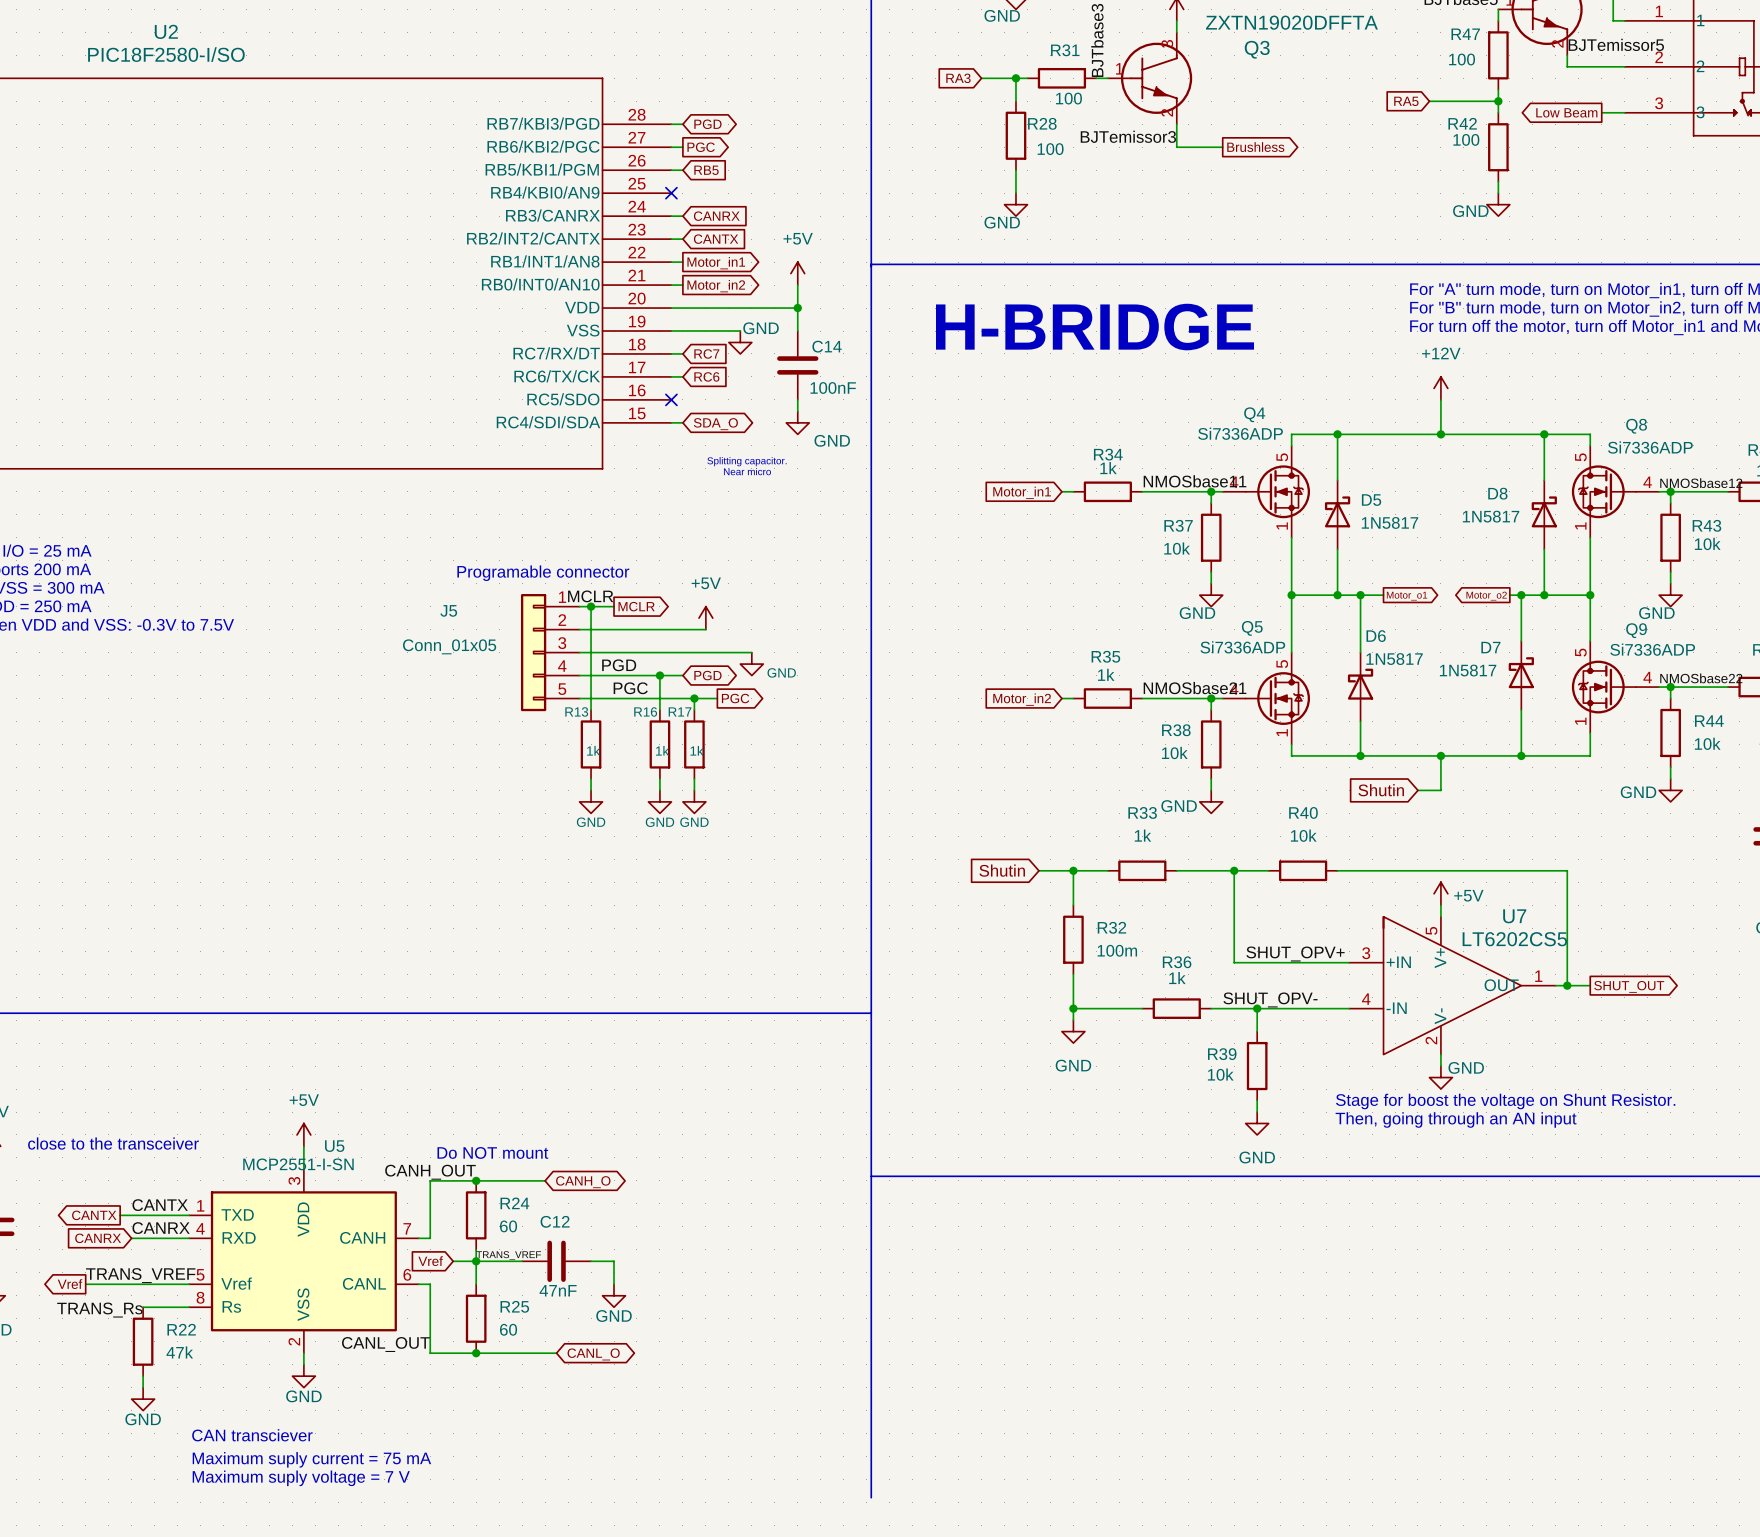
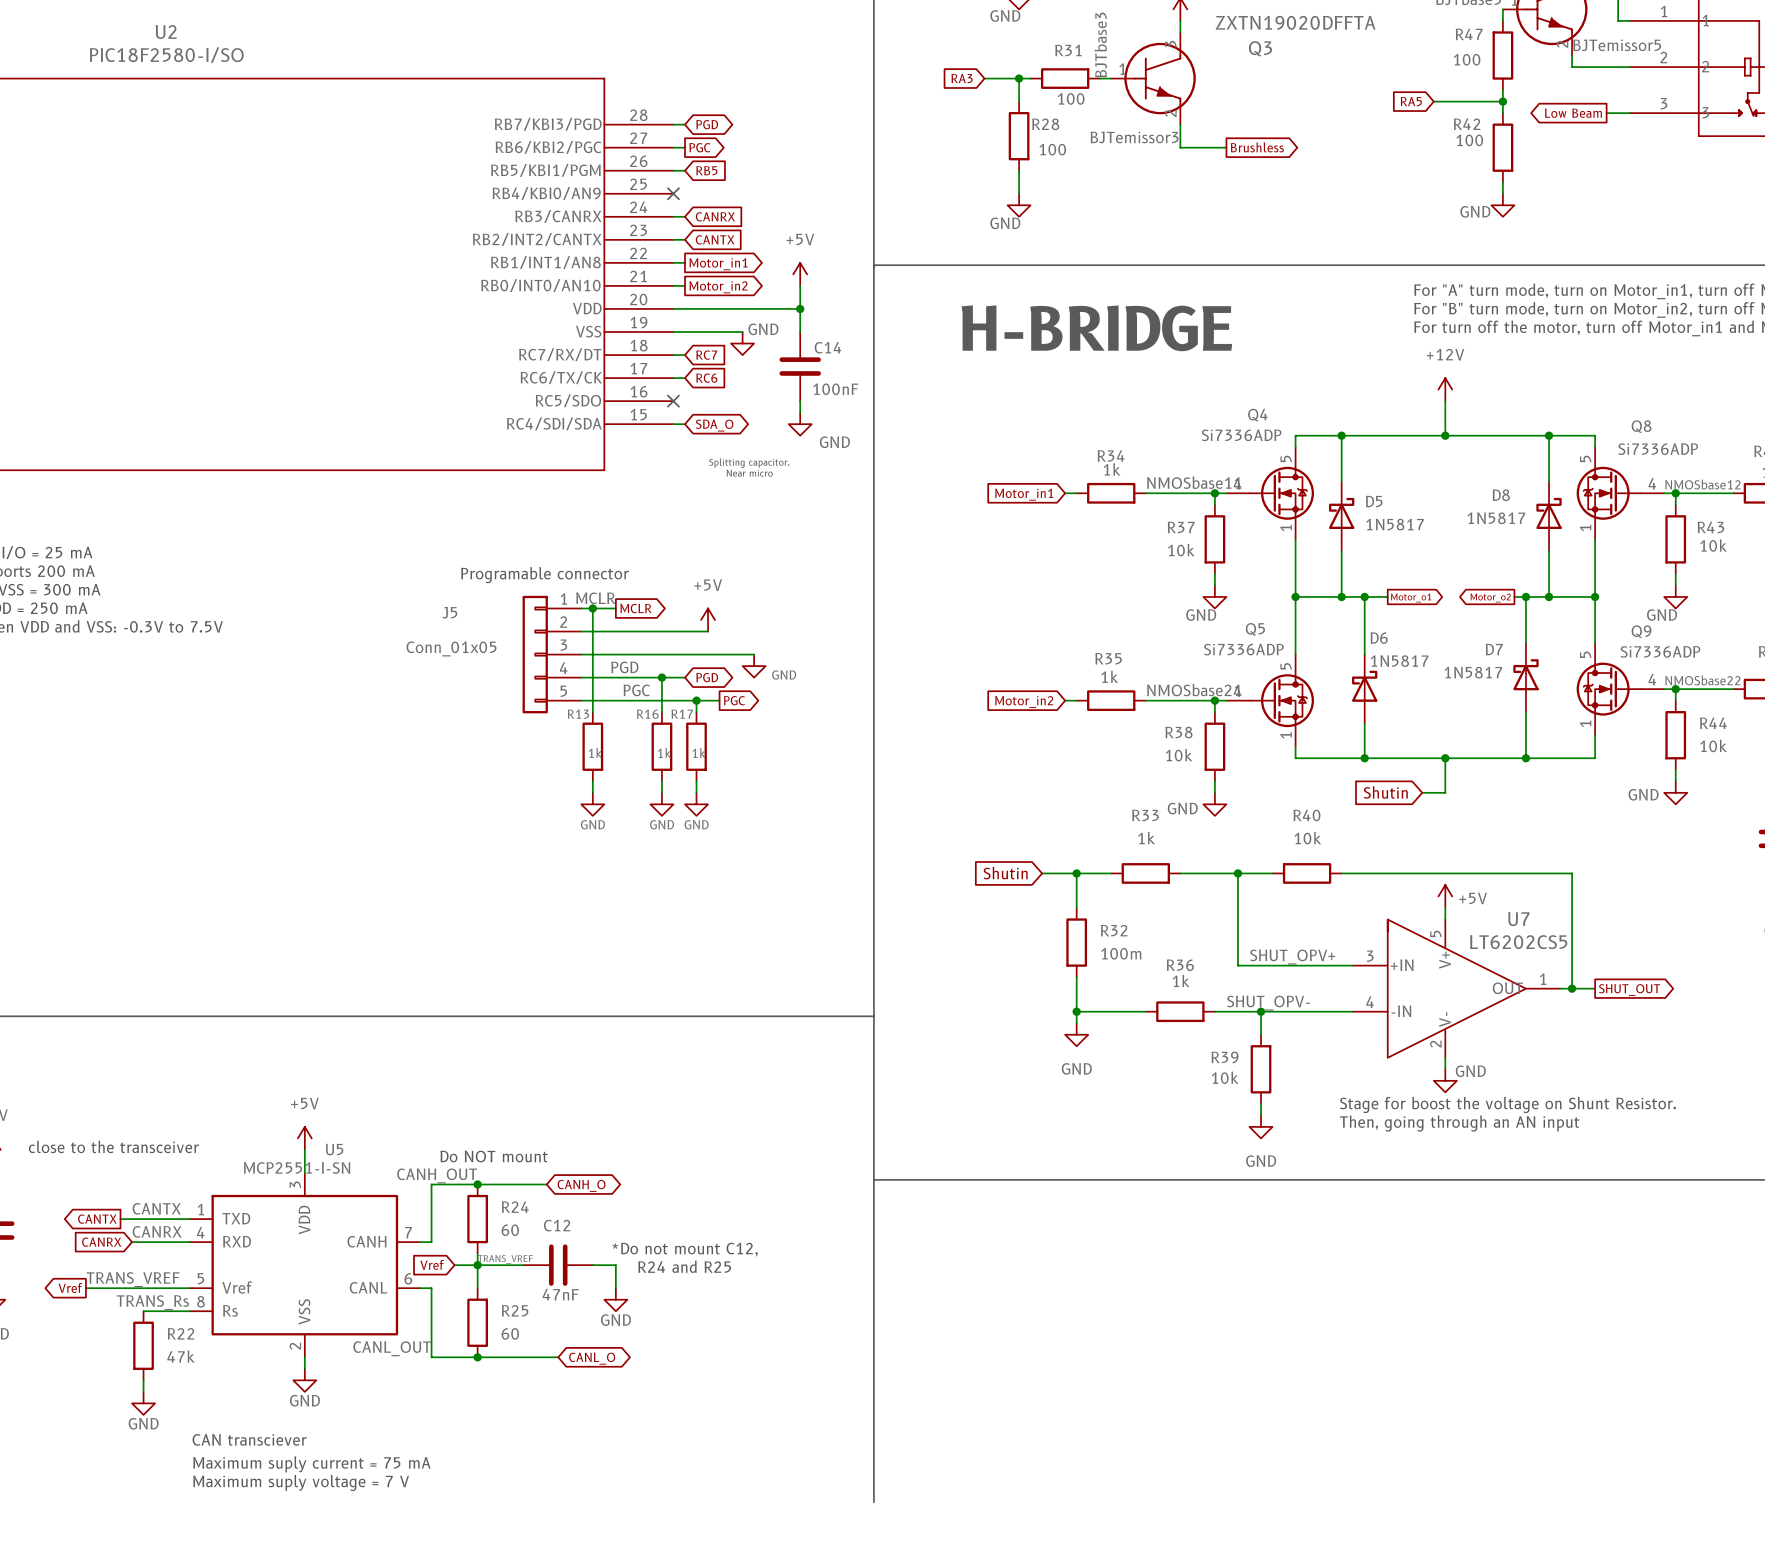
text: none -> *Do not mount C12, (685, 1249)
text: none -> R24 and R25 (684, 1266)
label position: TRANS_Rs (99, 1310) -> TRANS_Rs (152, 1302)

